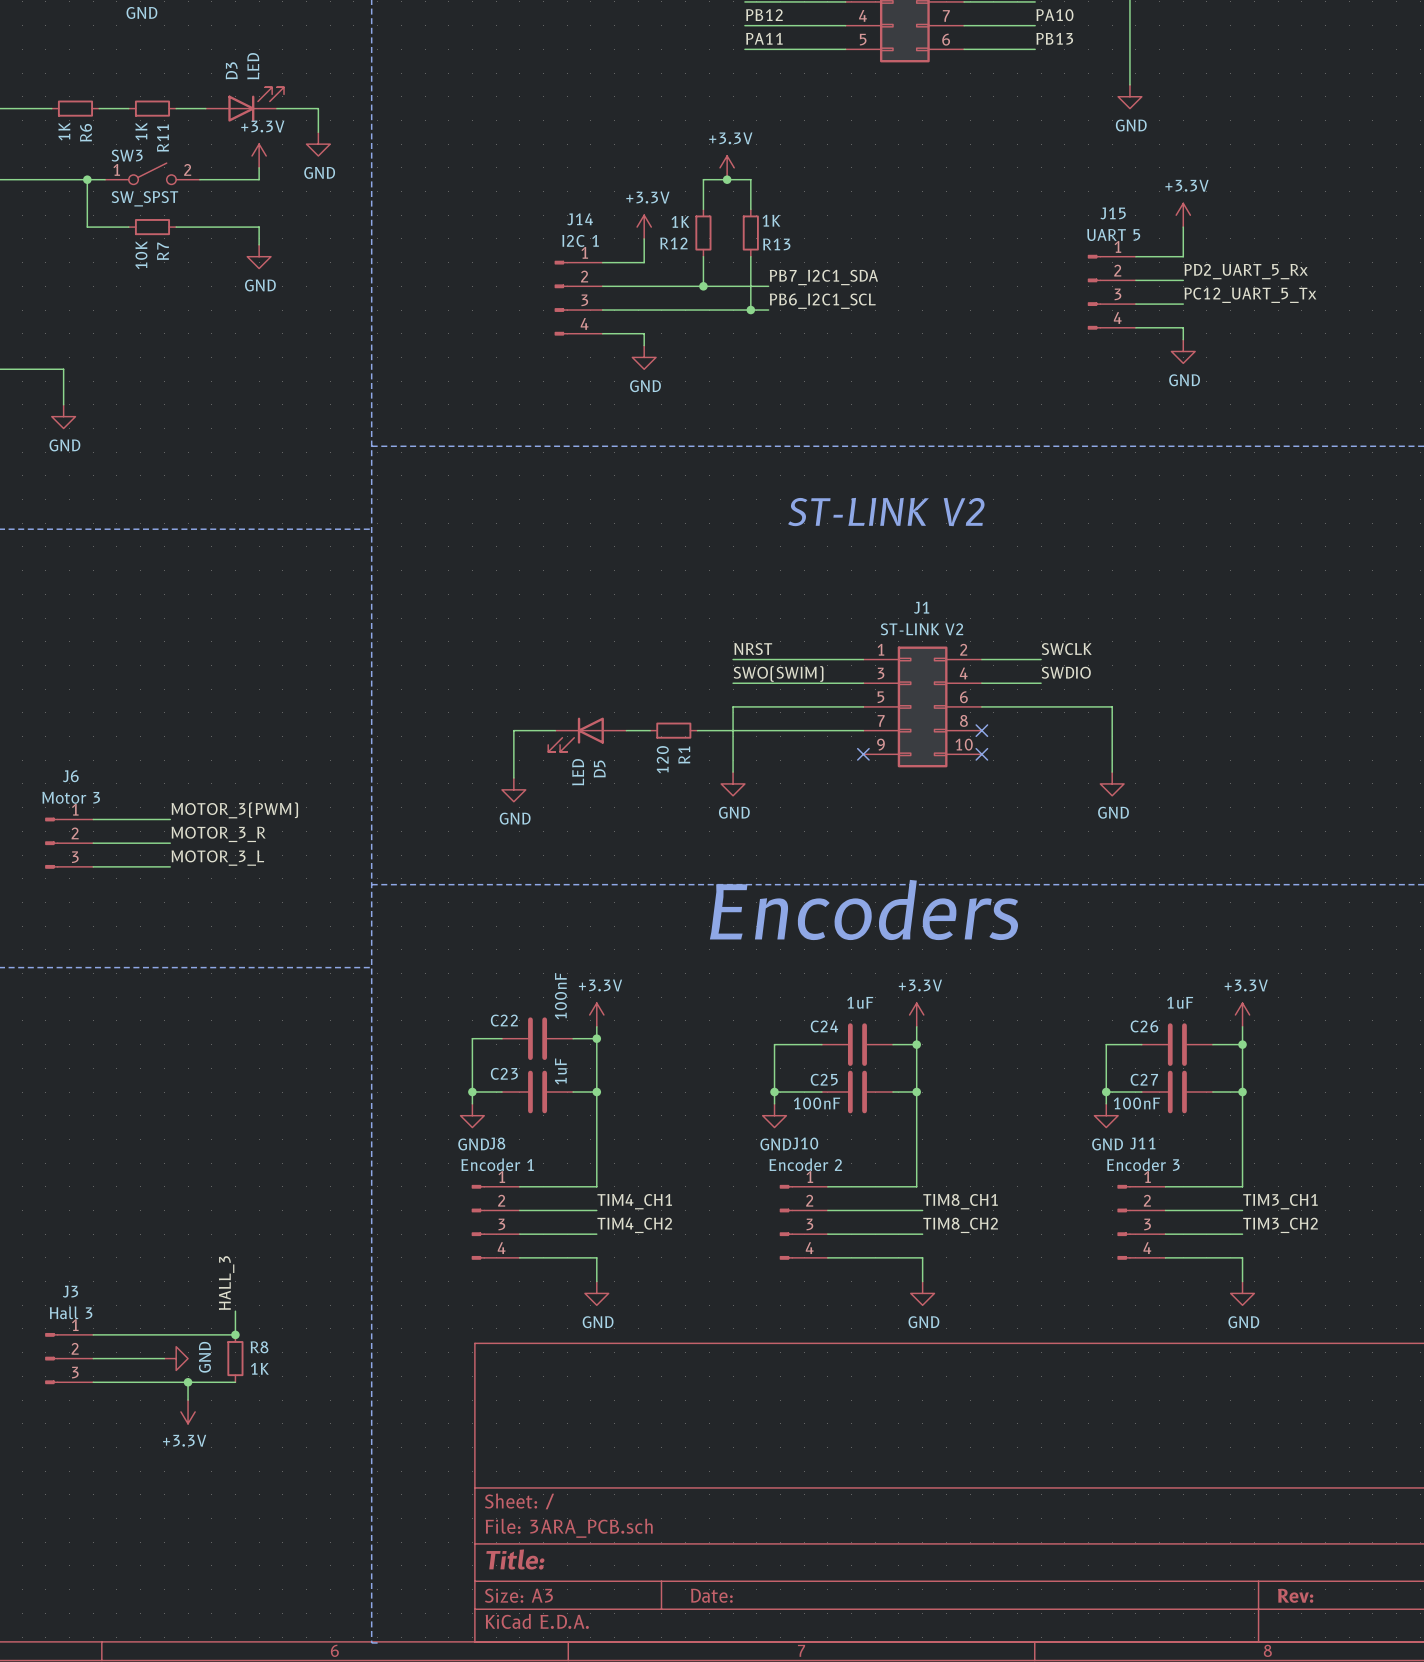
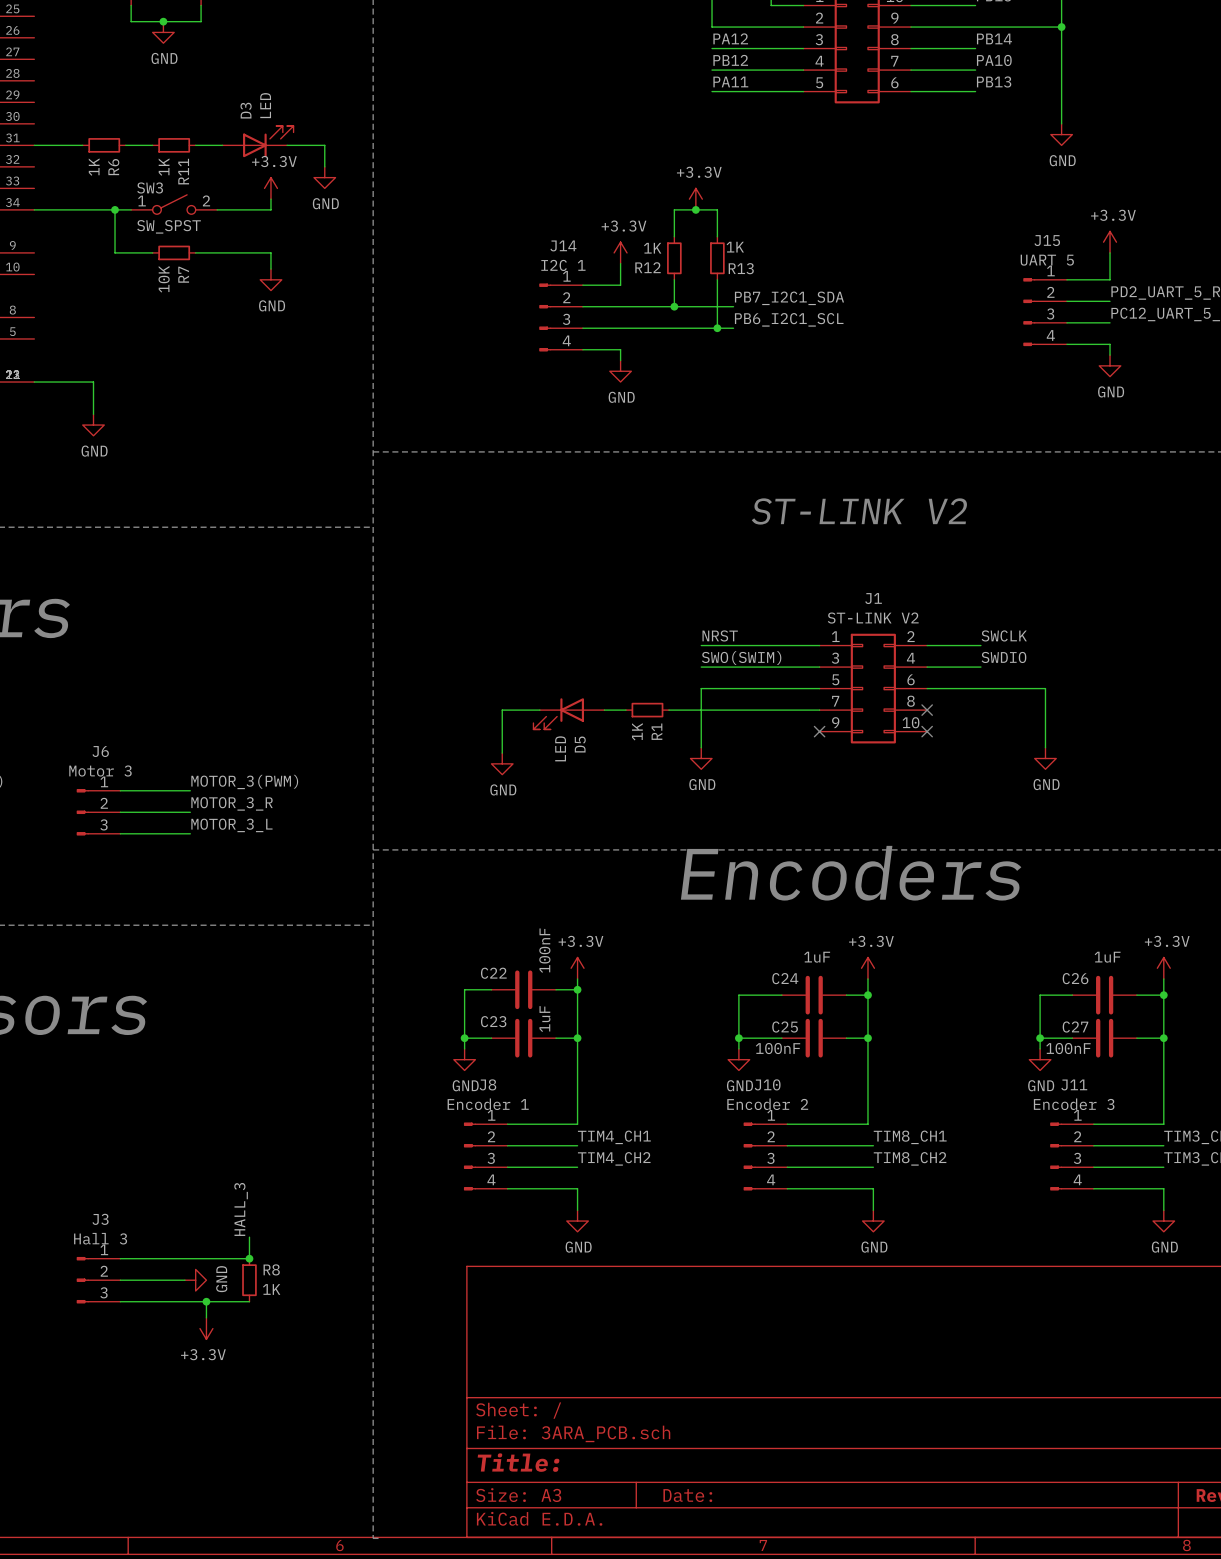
R1 value: 120 (662, 759) -> 1K (637, 731)

